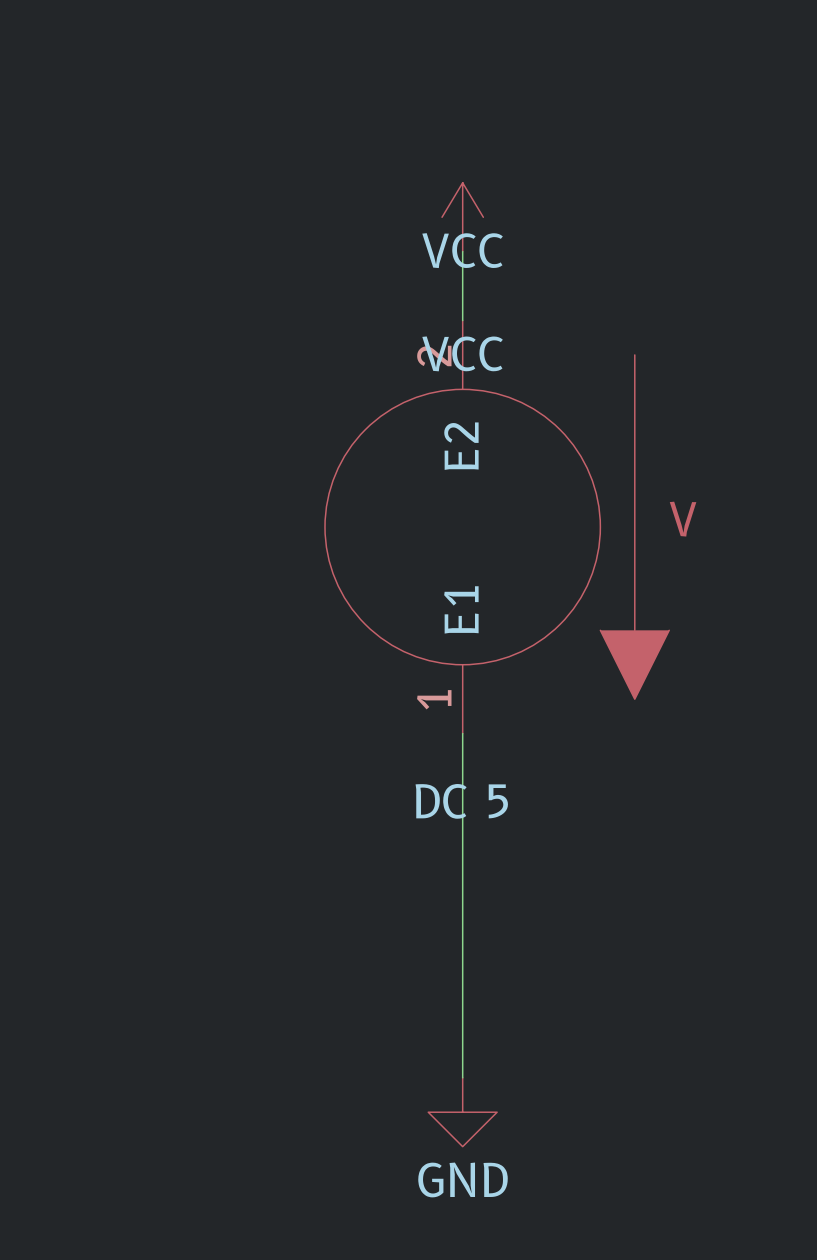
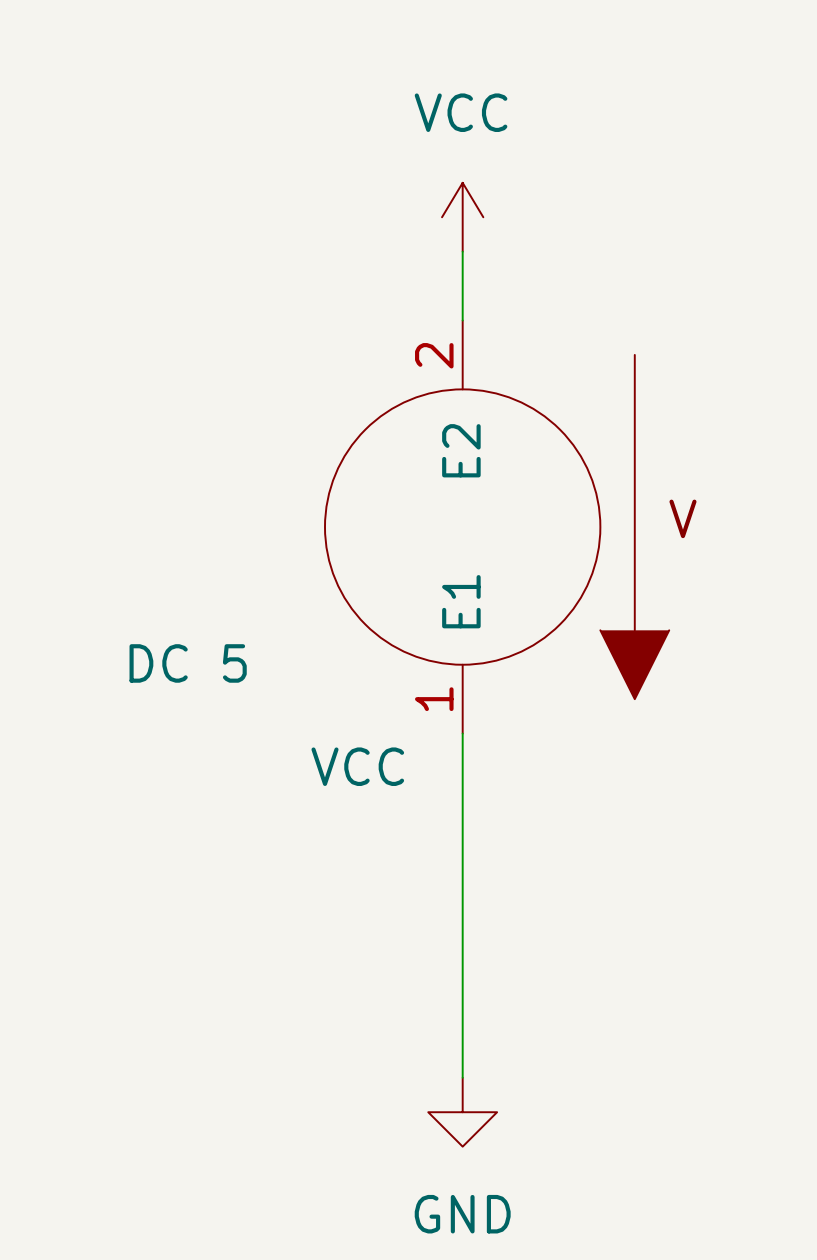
VCC name position: VCC (462, 250) -> VCC (357, 766)
power symbol text position: VCC (462, 353) -> VCC (461, 112)
VCC value position: DC 5 (461, 801) -> DC 5 (188, 663)
power symbol text position: GND (463, 1179) -> GND (462, 1214)

